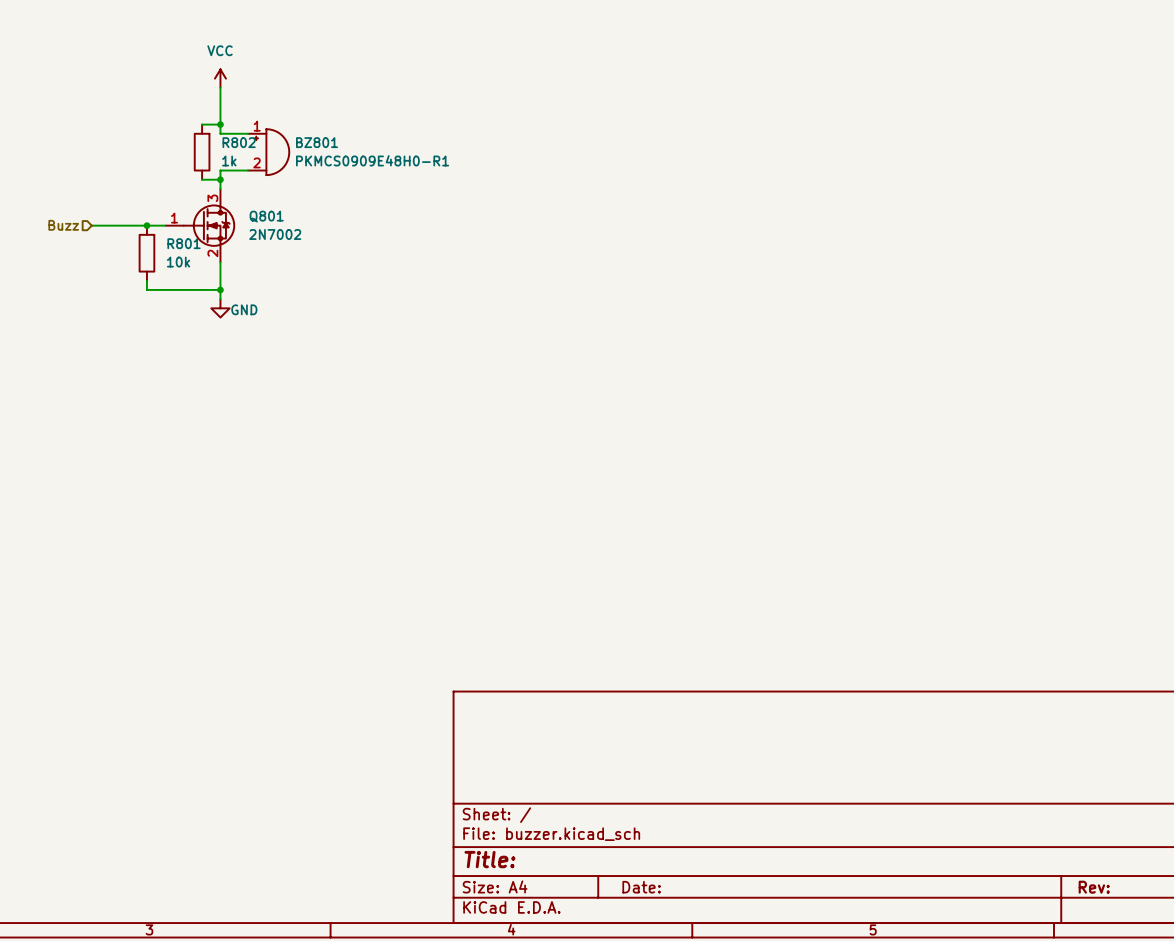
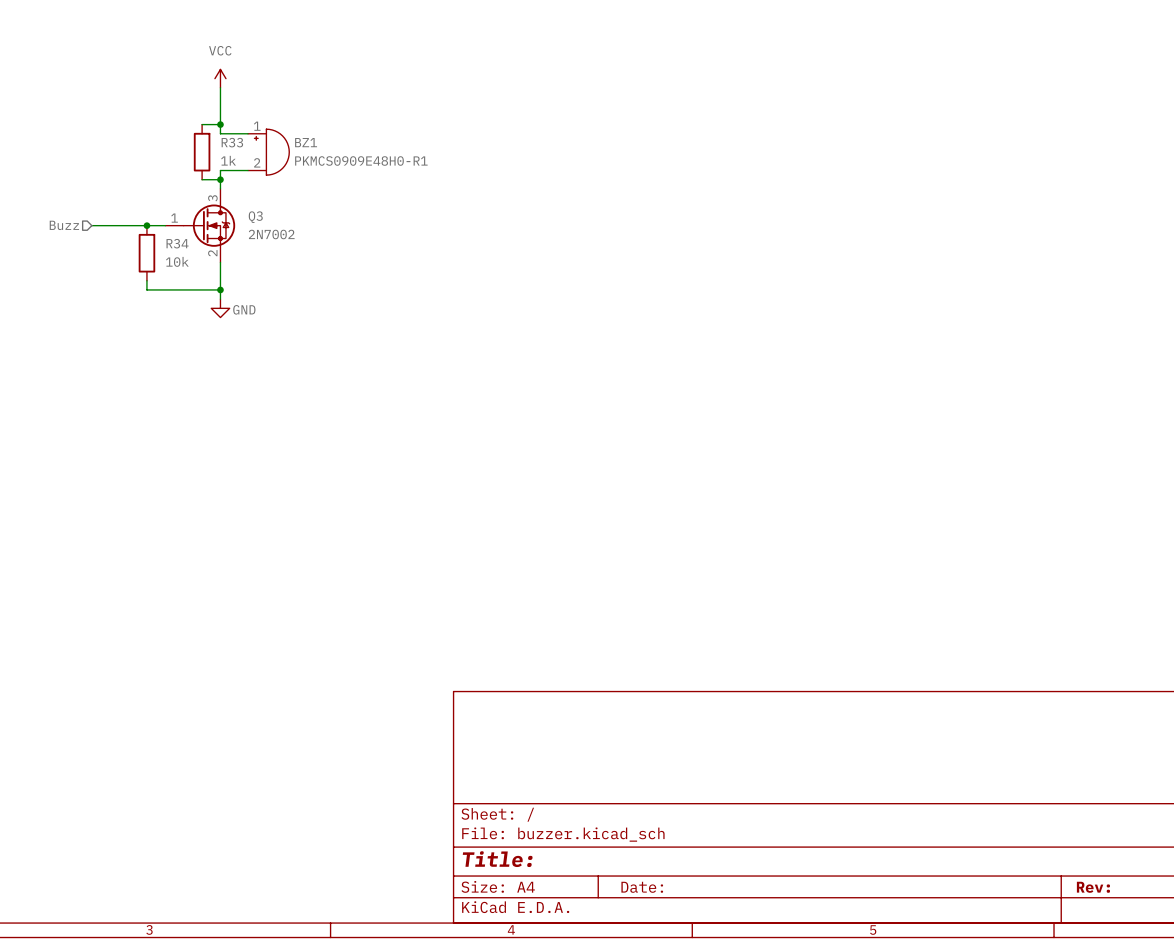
R802 name: R802 (239, 142) -> R33 (232, 142)
BZ801 name: BZ801 (317, 142) -> BZ1 (306, 142)
Q801 name: Q801 (266, 216) -> Q3 (255, 217)
R801 name: R801 (184, 243) -> R34 (177, 243)

